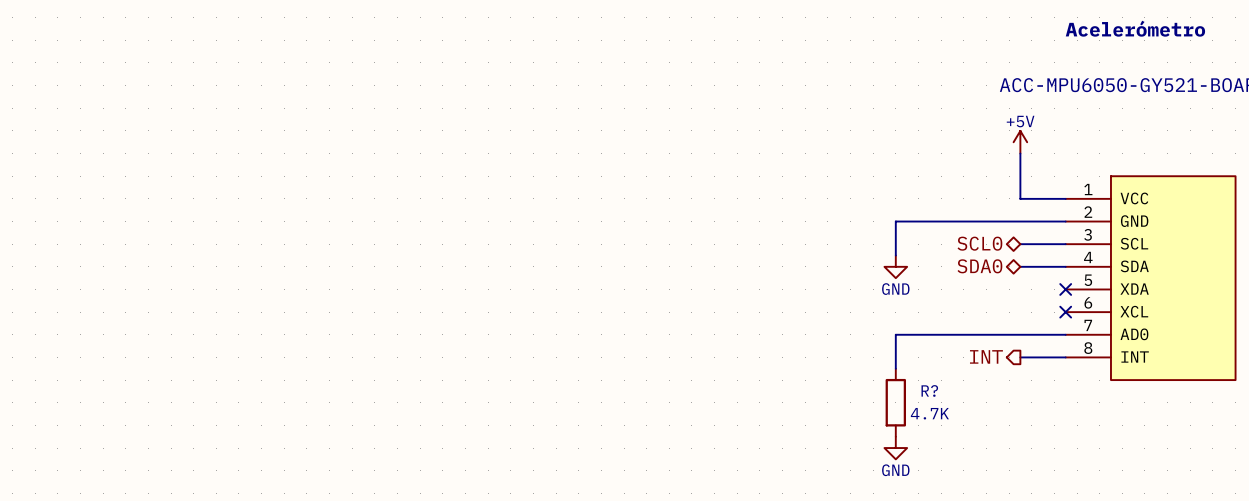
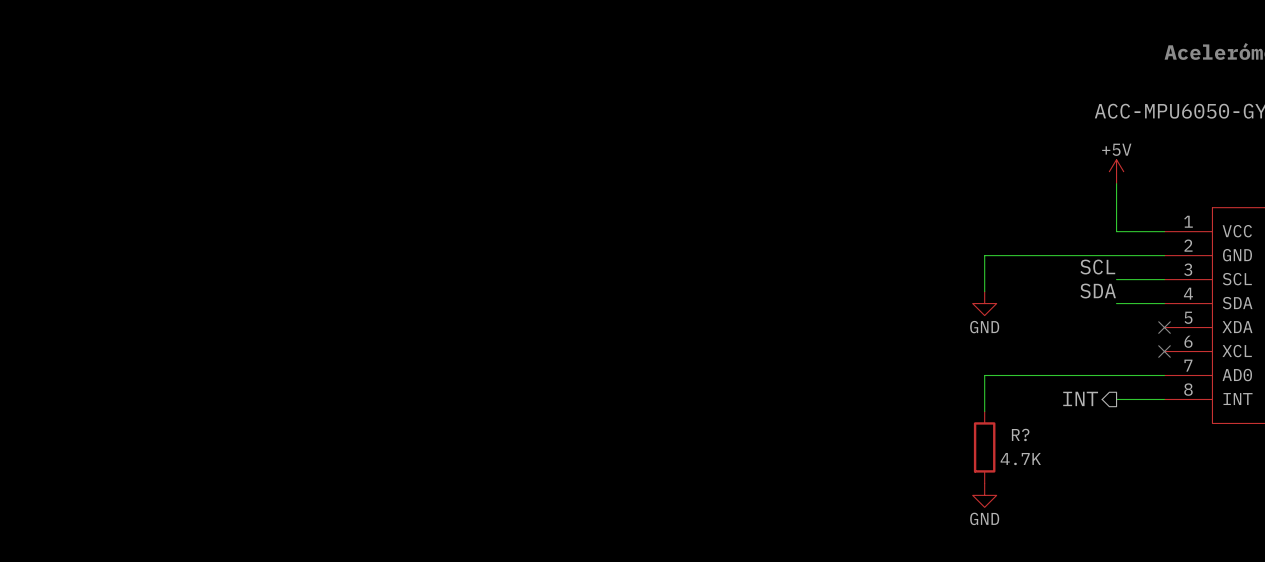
label: none -> SCL (1097, 267)
hierarchical label: SCL0 (979, 243) -> none
label: none -> SDA (1098, 291)
hierarchical label: SDA0 (979, 266) -> none

